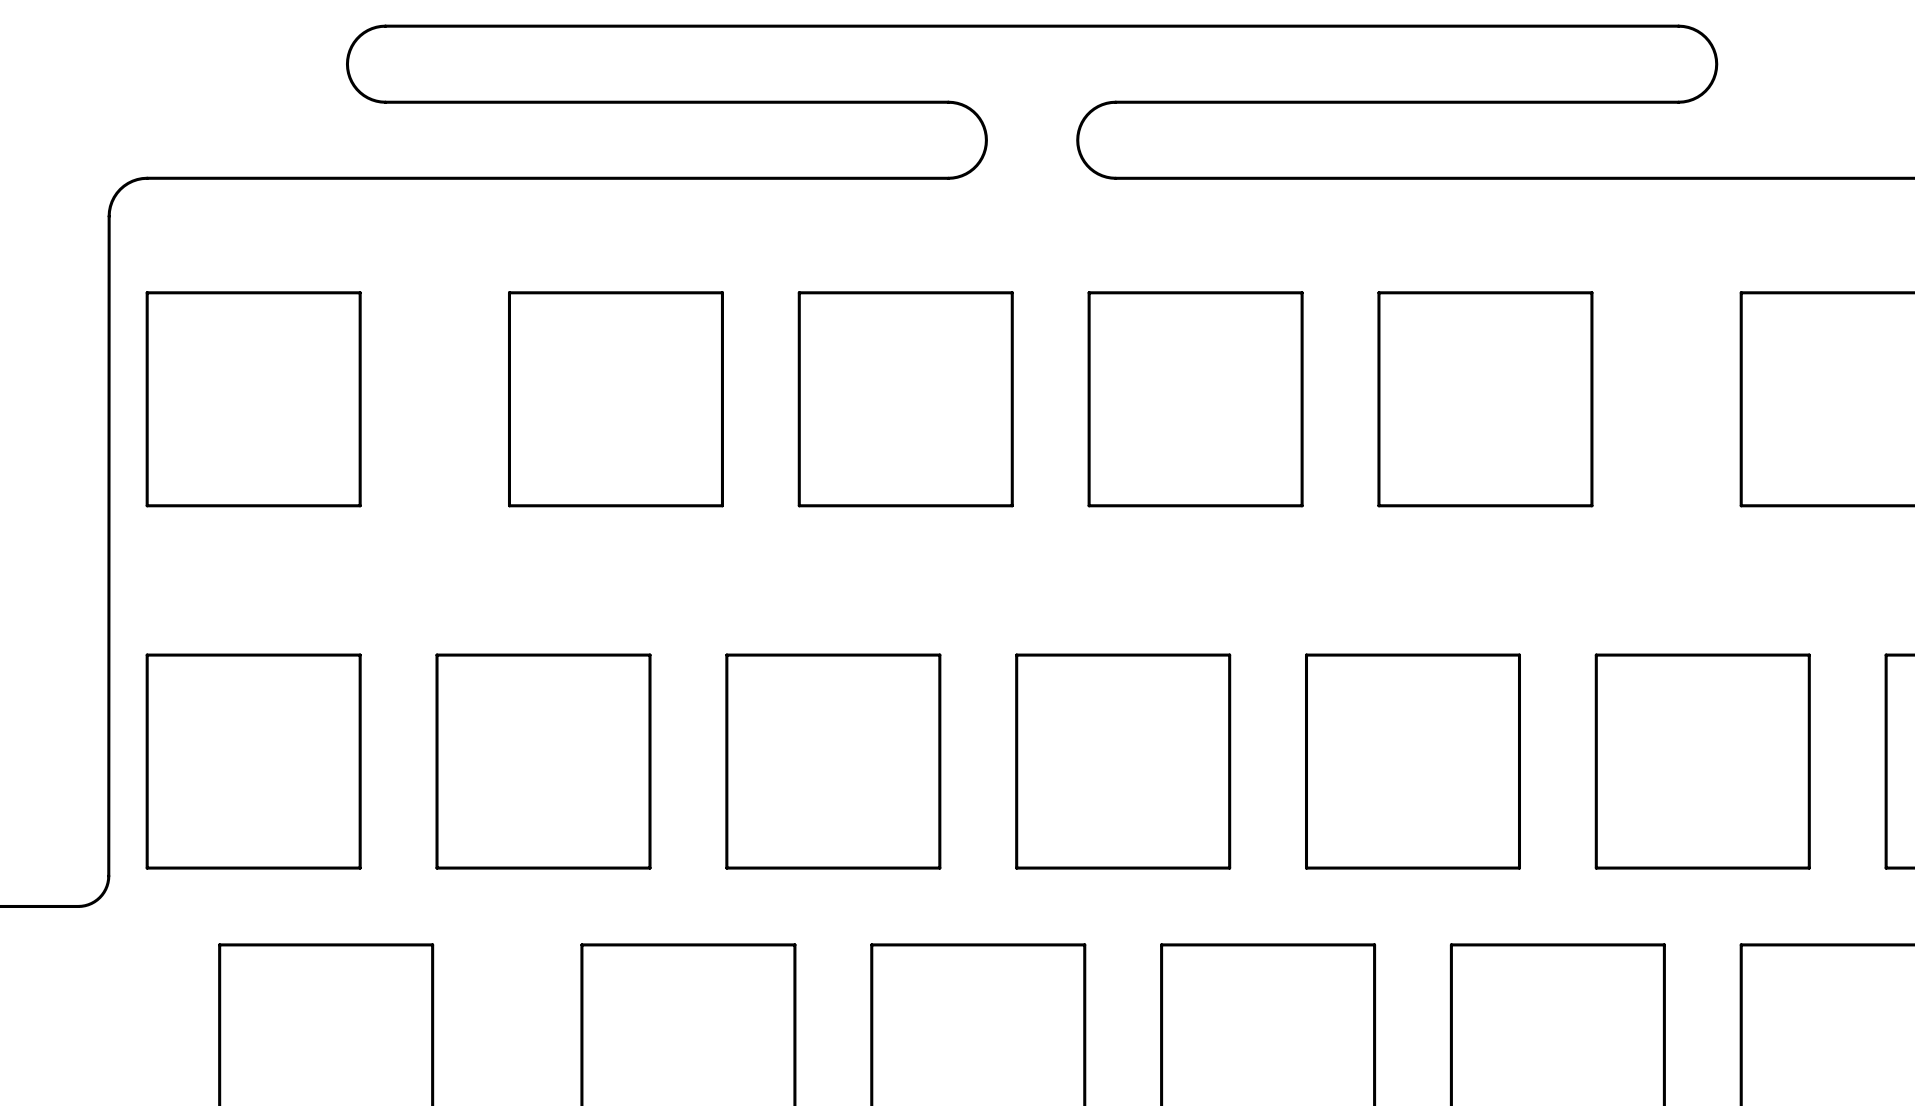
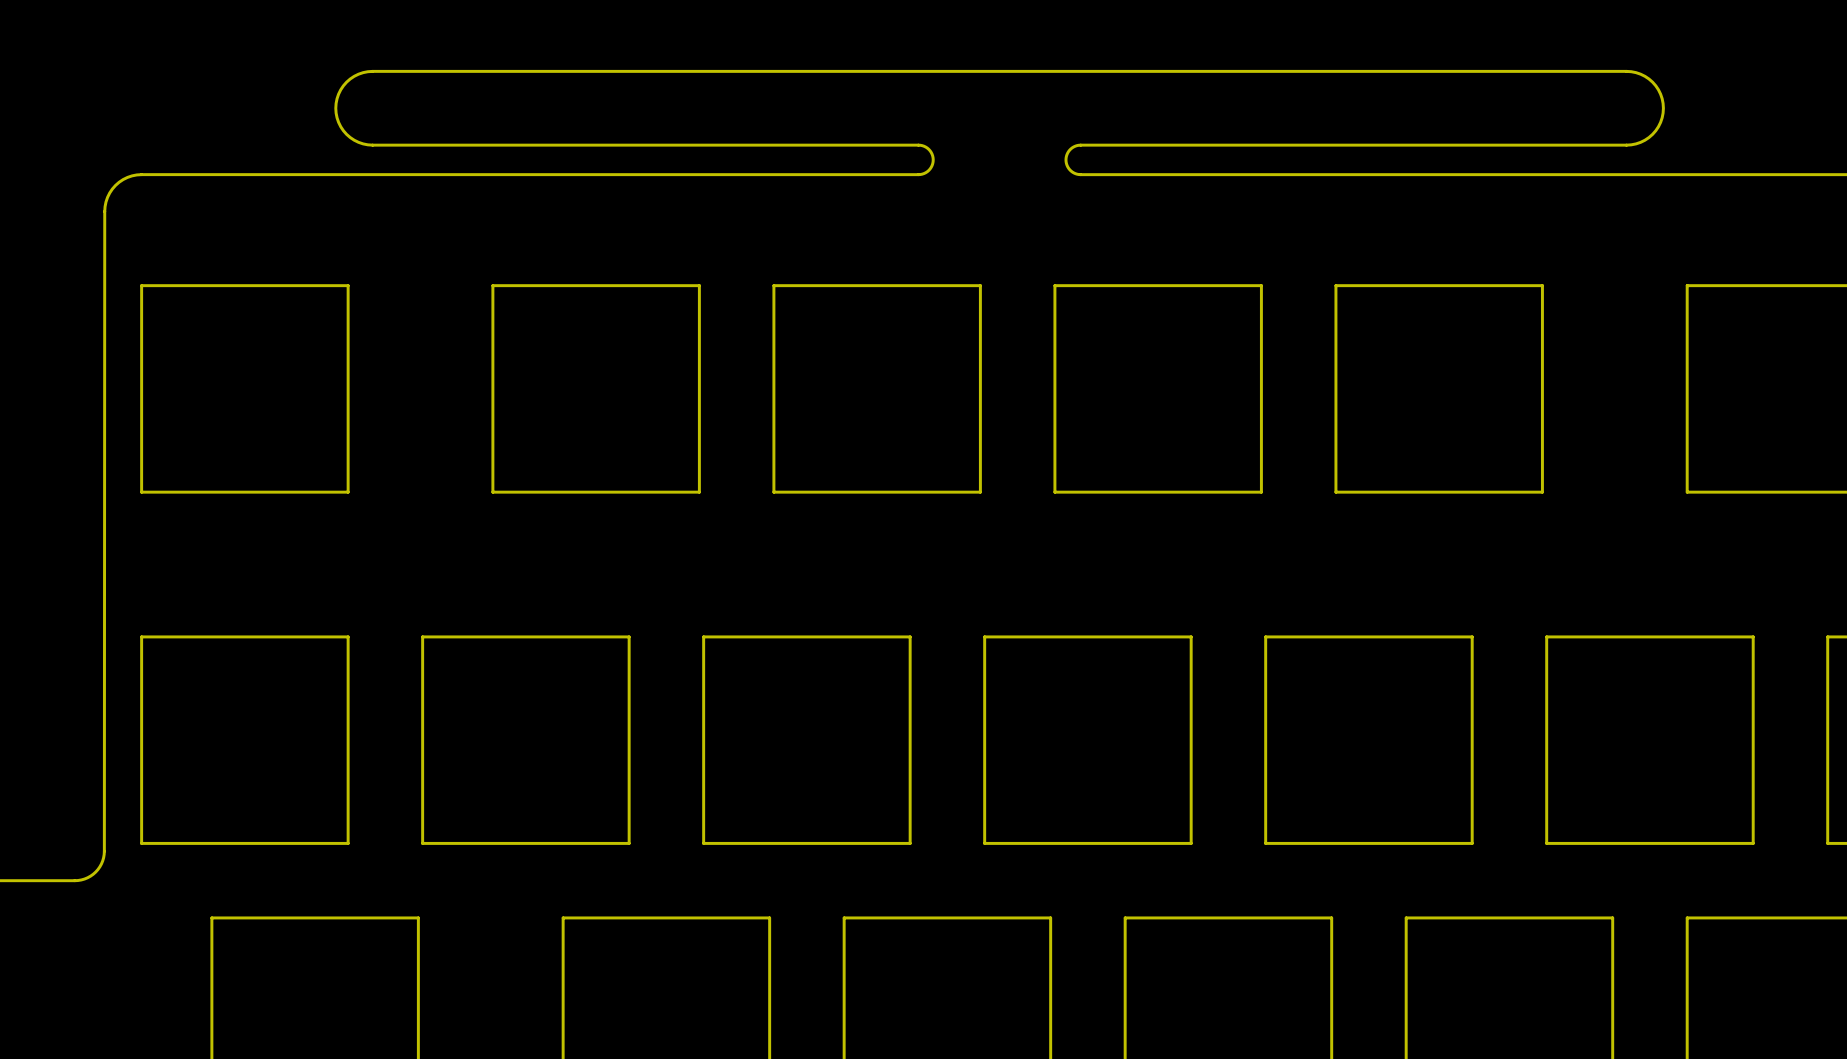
board edge: (948, 178) (961, 175) (973, 168) (982, 157) (986, 144) (985, 131) (979, 118) (970, 108) (957, 103) (380, 101) (367, 97) (354, 85) (347, 68) (348, 55) (354, 42) (360, 35) (372, 28) (385, 26) (1678, 26) (1693, 29) (1701, 34) (1711, 45) (1715, 54) (1716, 69) (1711, 83) (1701, 94) (1683, 101) (1106, 103) (1094, 108) (1084, 118) (1078, 131) (1078, 144) (1082, 157) (1090, 168) (1102, 175) (1115, 178) -> (918, 174) (928, 170) (933, 159) (928, 149) (918, 145) (367, 144) (354, 140) (343, 130) (337, 117) (336, 103) (340, 89) (350, 79) (363, 72) (372, 71) (1626, 71) (1640, 74) (1652, 82) (1658, 89) (1663, 103) (1662, 117) (1655, 130) (1644, 140) (1631, 144) (1080, 145) (1069, 150) (1065, 159) (1070, 170) (1080, 174)

